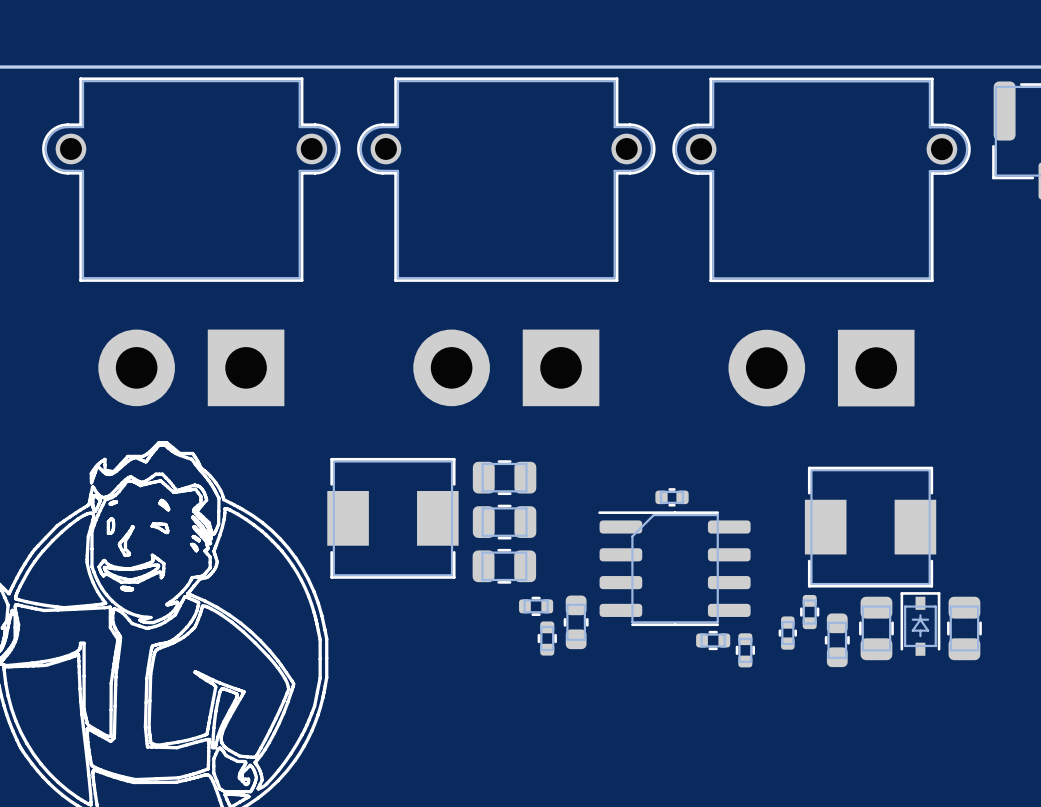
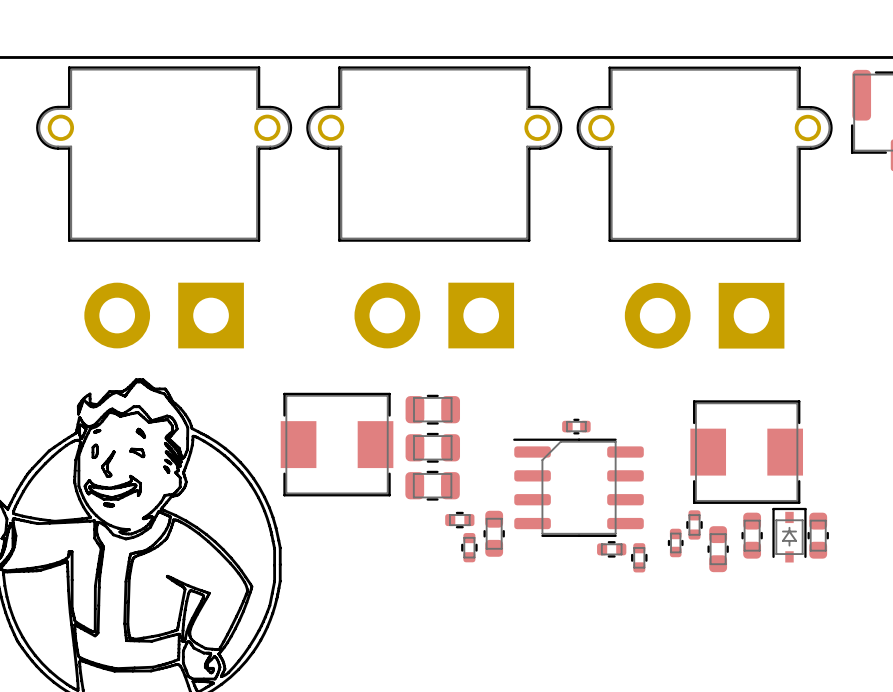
part footprint: [859, 596, 894, 661] -> [741, 512, 763, 559]
part footprint: [947, 596, 982, 661] -> [807, 512, 829, 559]

